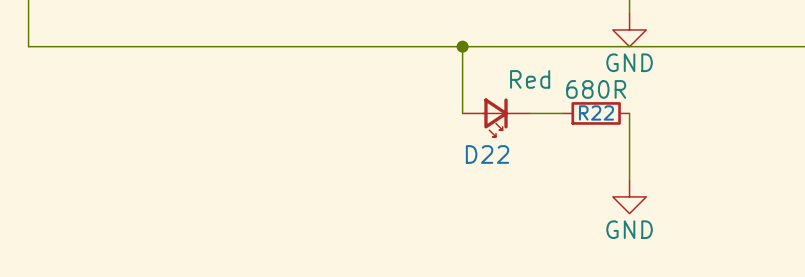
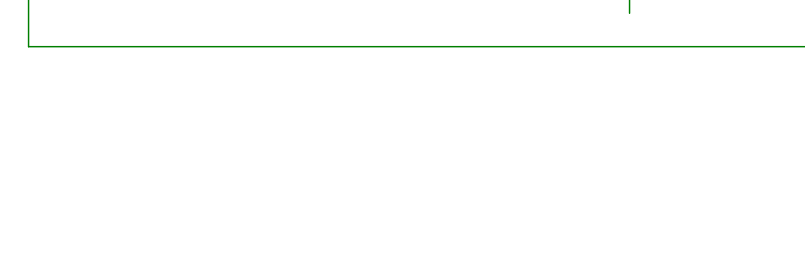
power symbol: GND (629, 29) -> none
wire: (462, 46) (462, 113) -> none
junction: (462, 46) -> none
wire: (529, 113) (562, 113) -> none
R22: 680R (596, 113) -> none
wire: (629, 113) (629, 180) -> none
D22: Red (496, 117) -> none
power symbol: GND (629, 196) -> none

